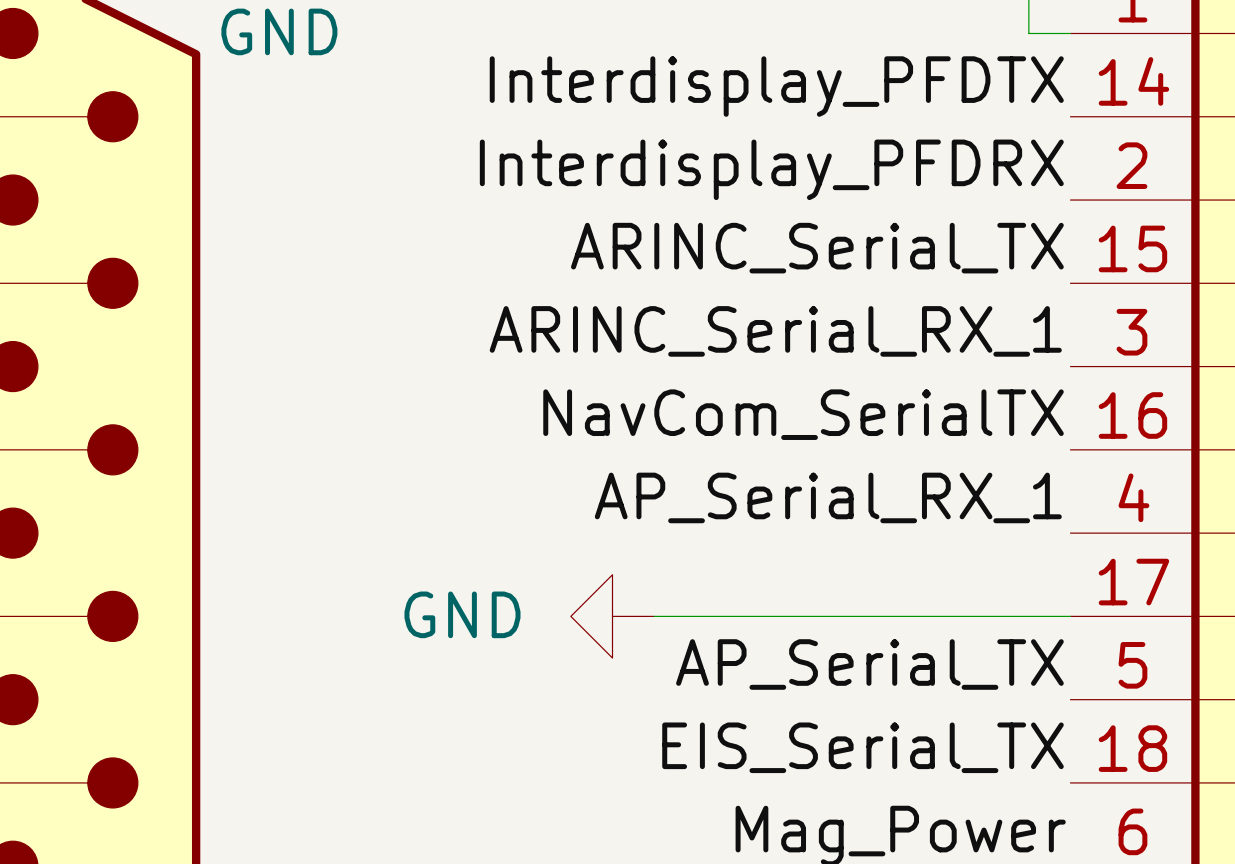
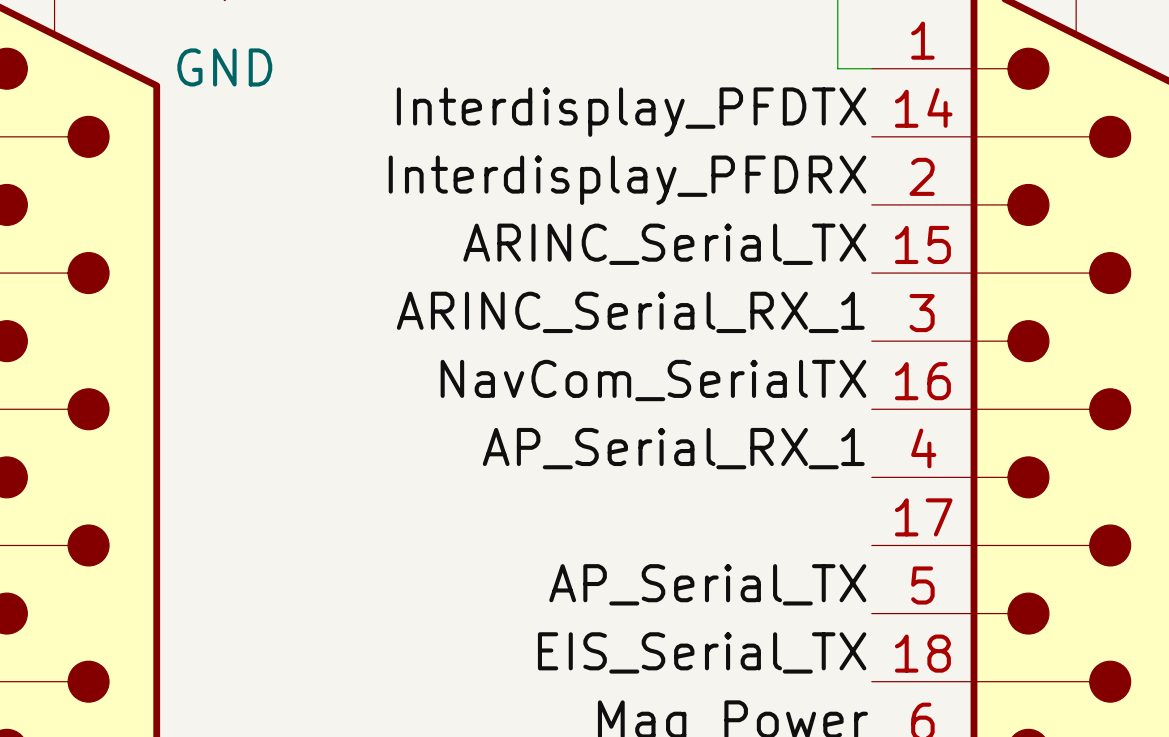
power symbol: GND (612, 616) -> none
wire: (654, 616) (1070, 616) -> none

